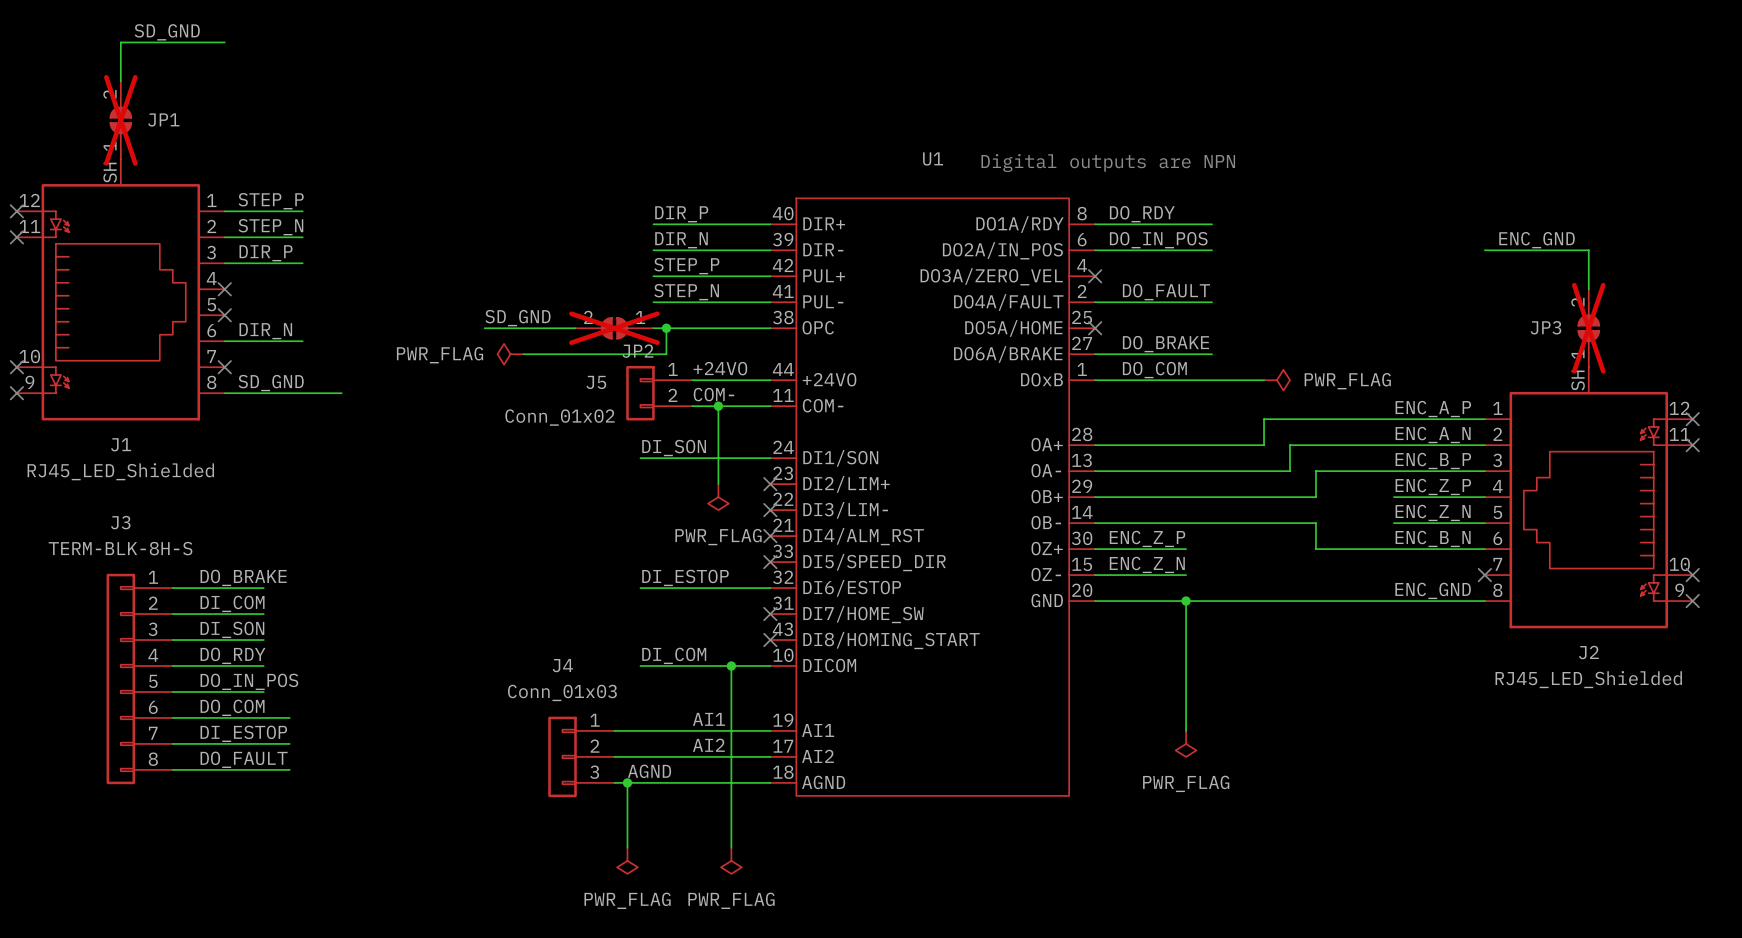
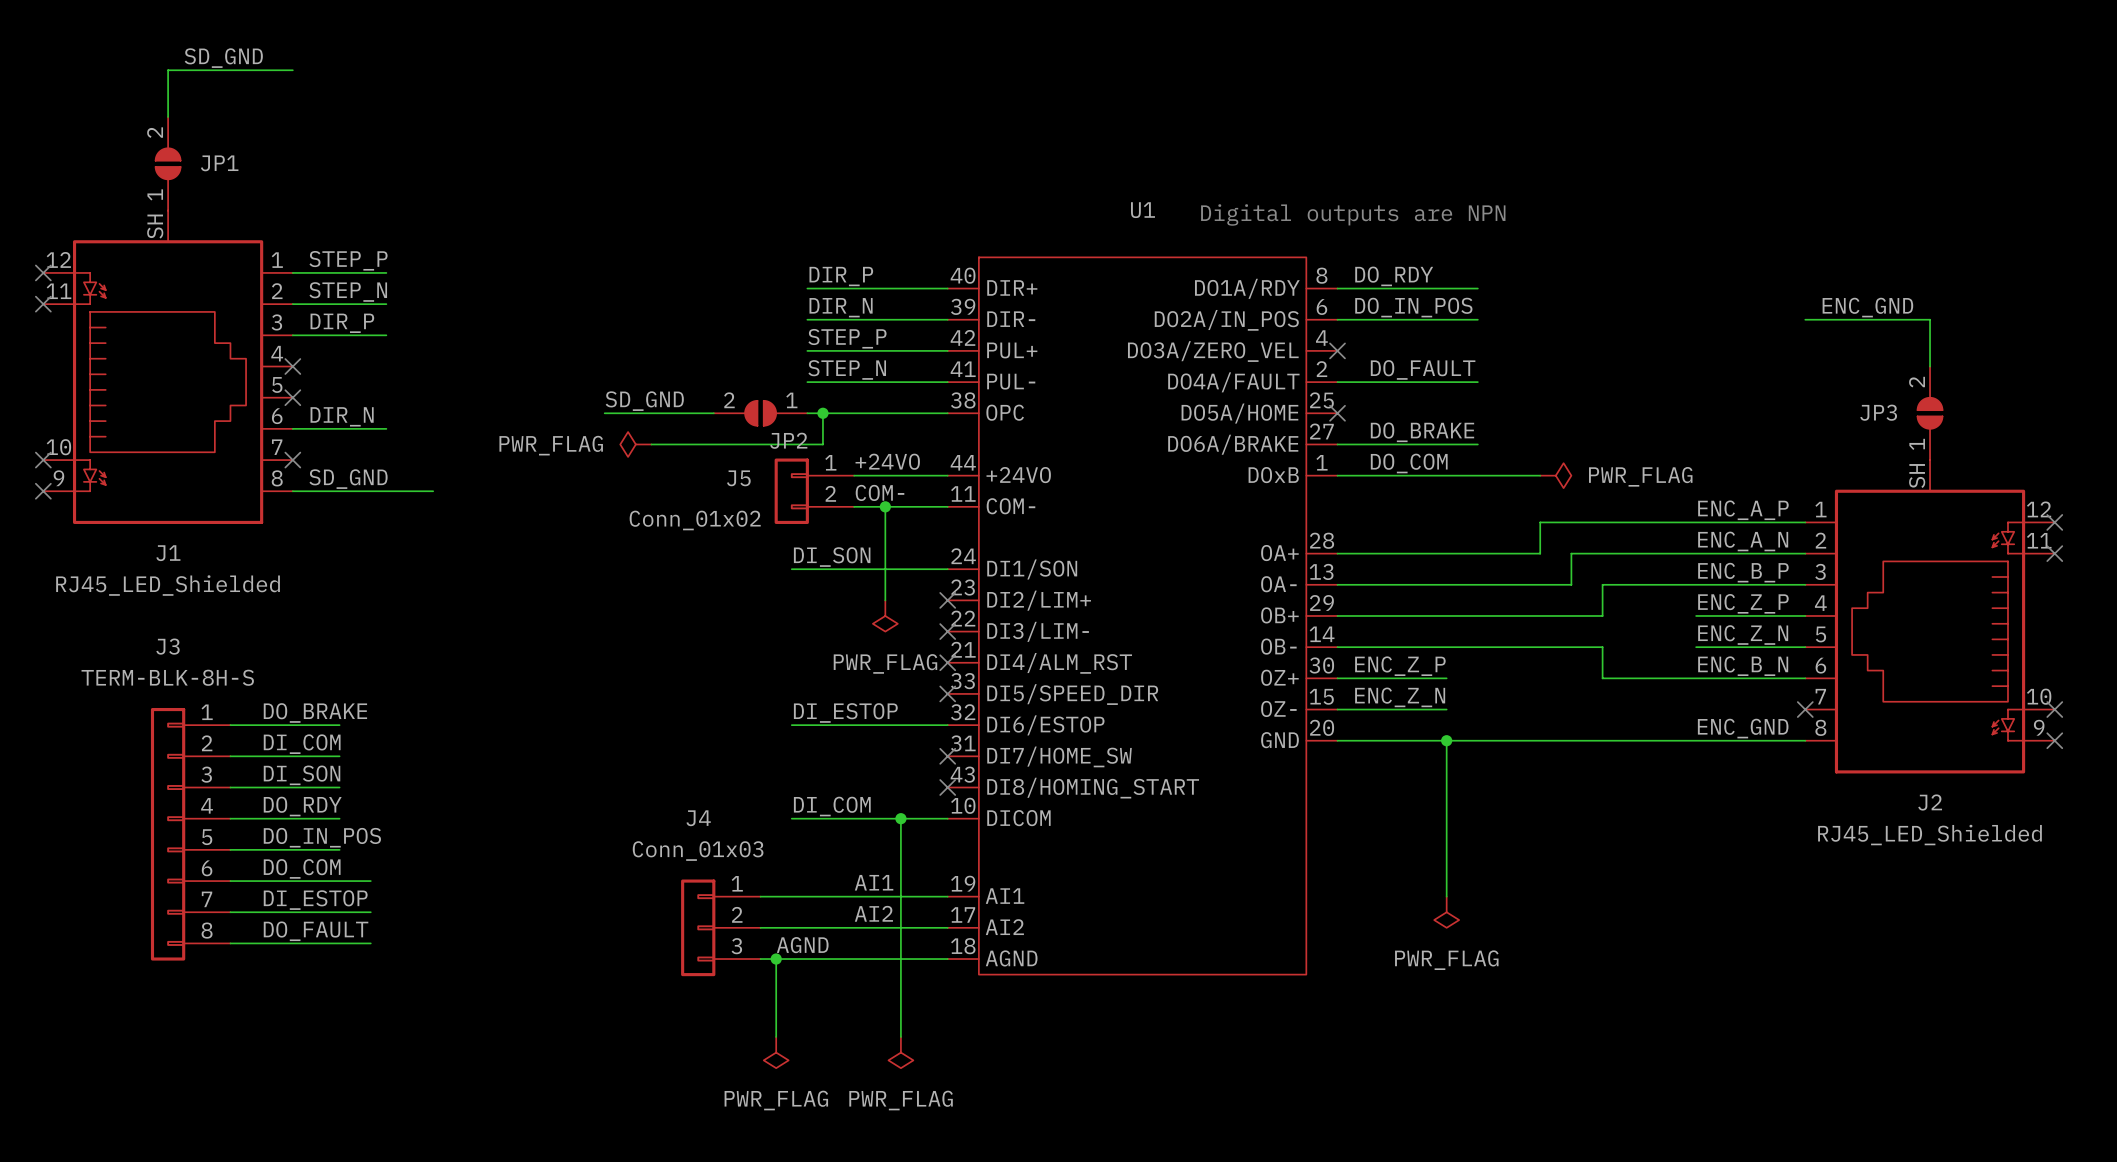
JP1 do-not-place cross: (120, 120) -> none
JP2 do-not-place cross: (614, 328) -> none
JP3 do-not-place cross: (1588, 328) -> none

